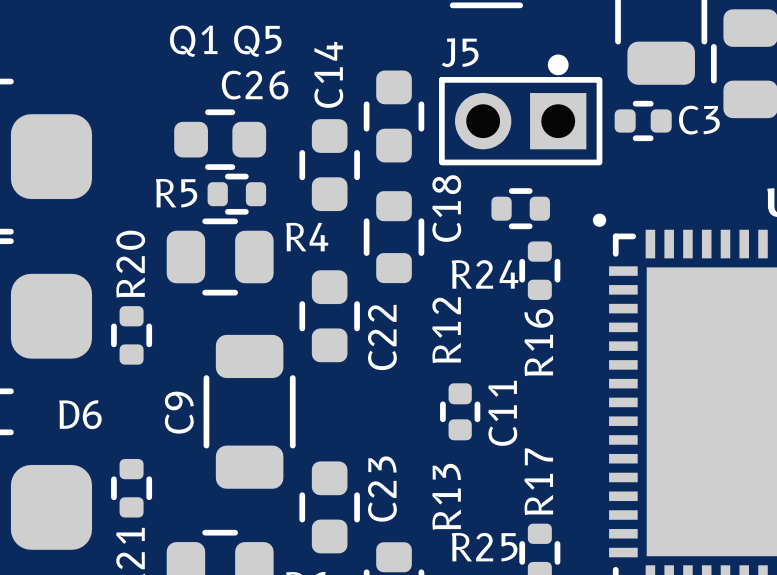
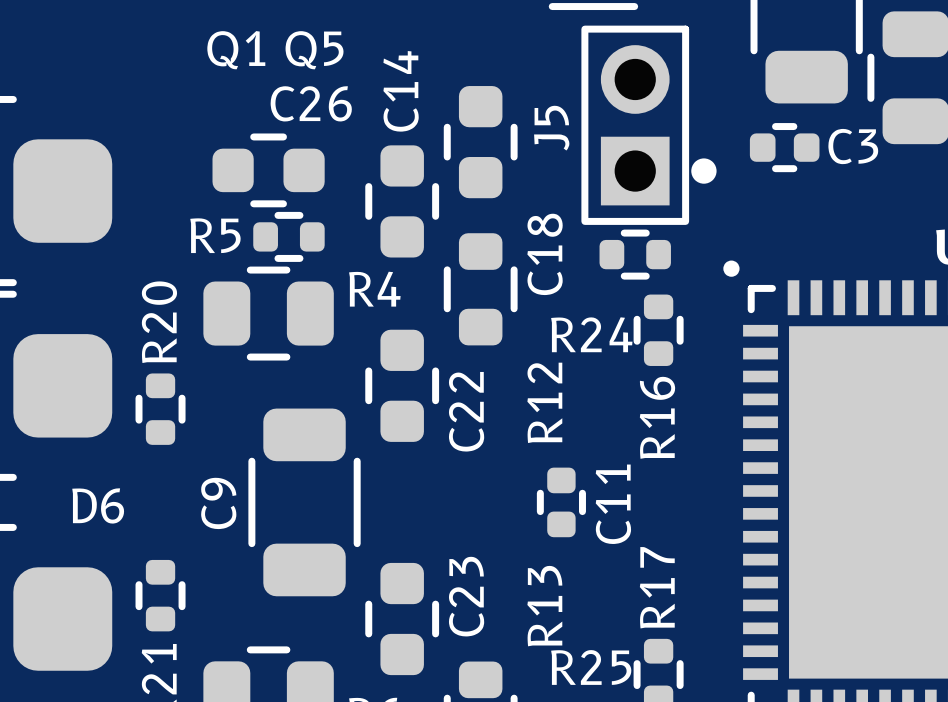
J5 rotation: 0° (520, 109) -> 90° clockwise (648, 125)

